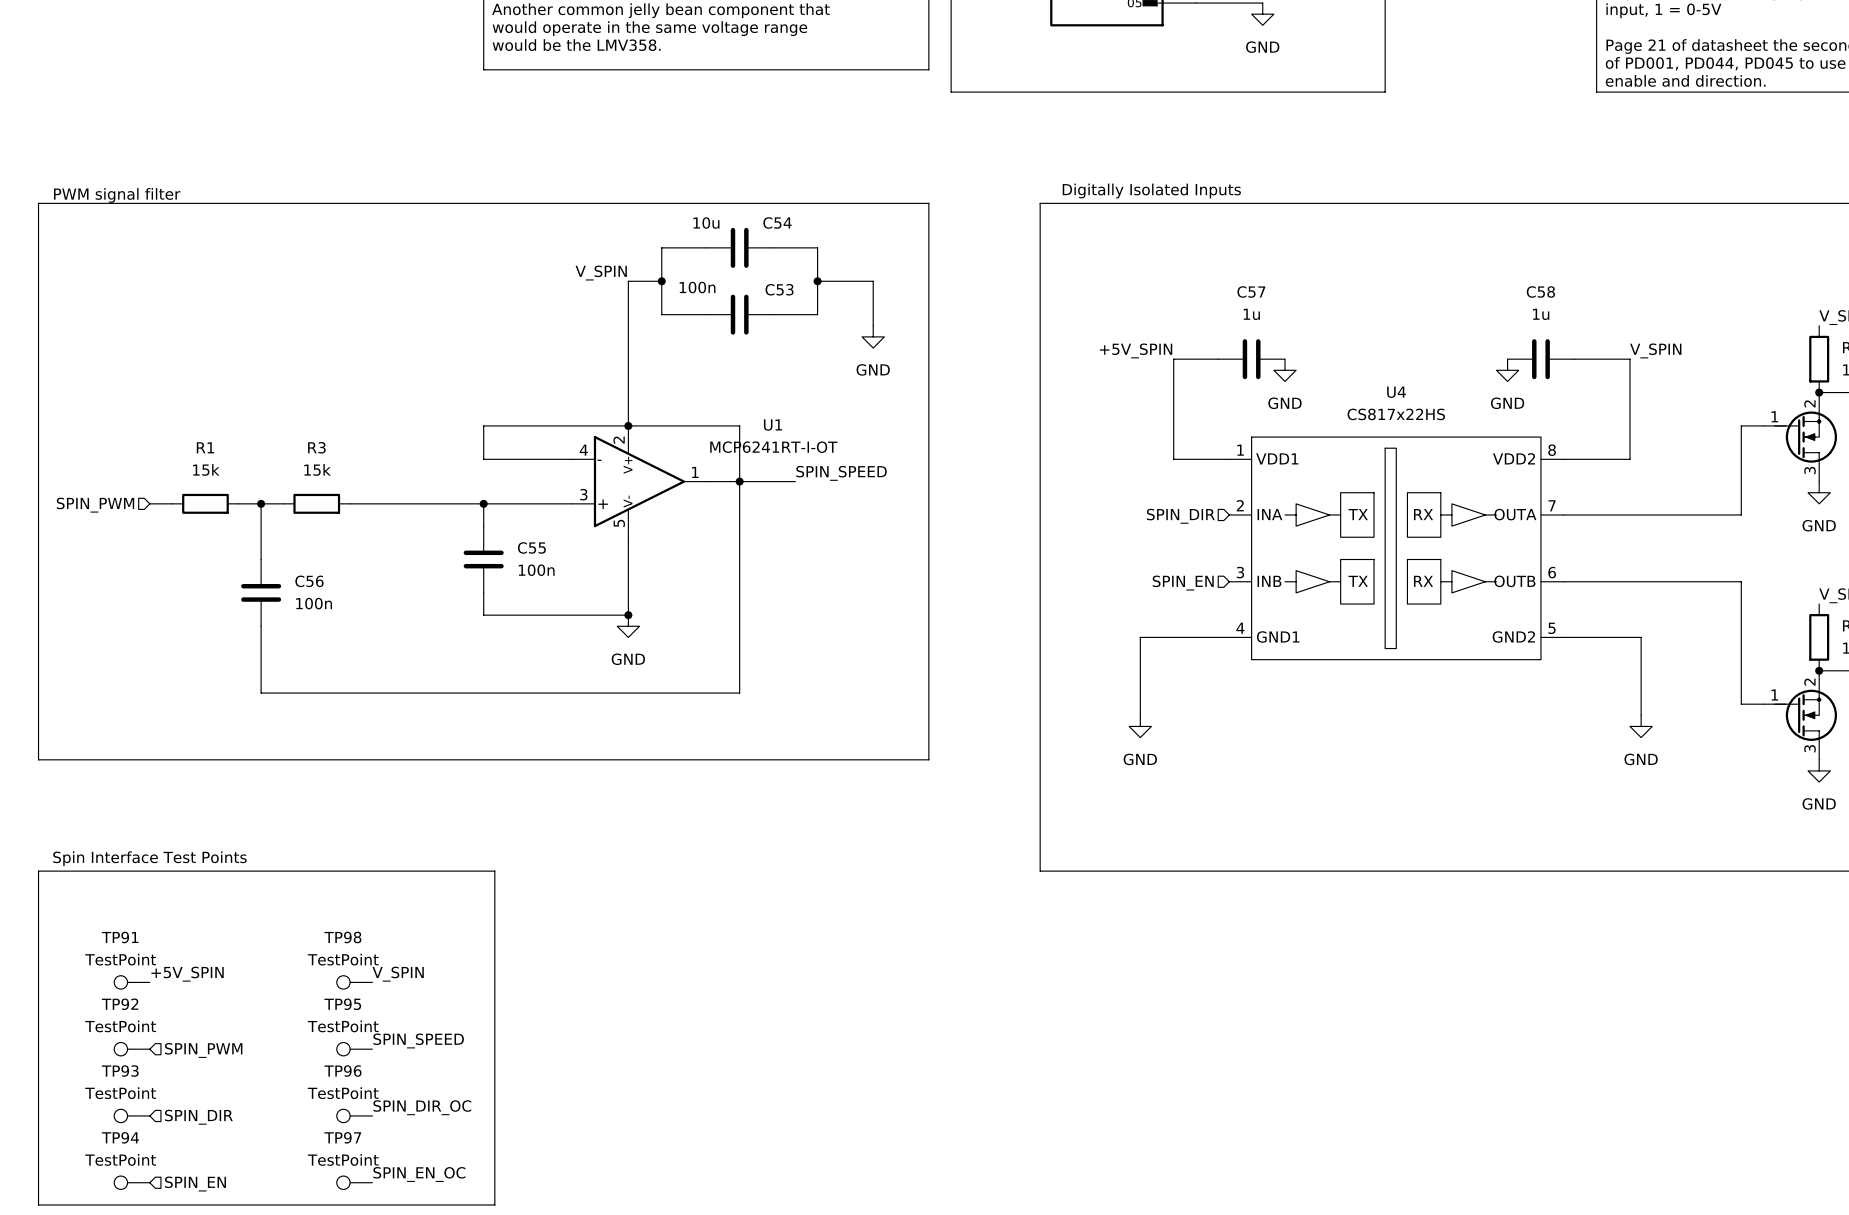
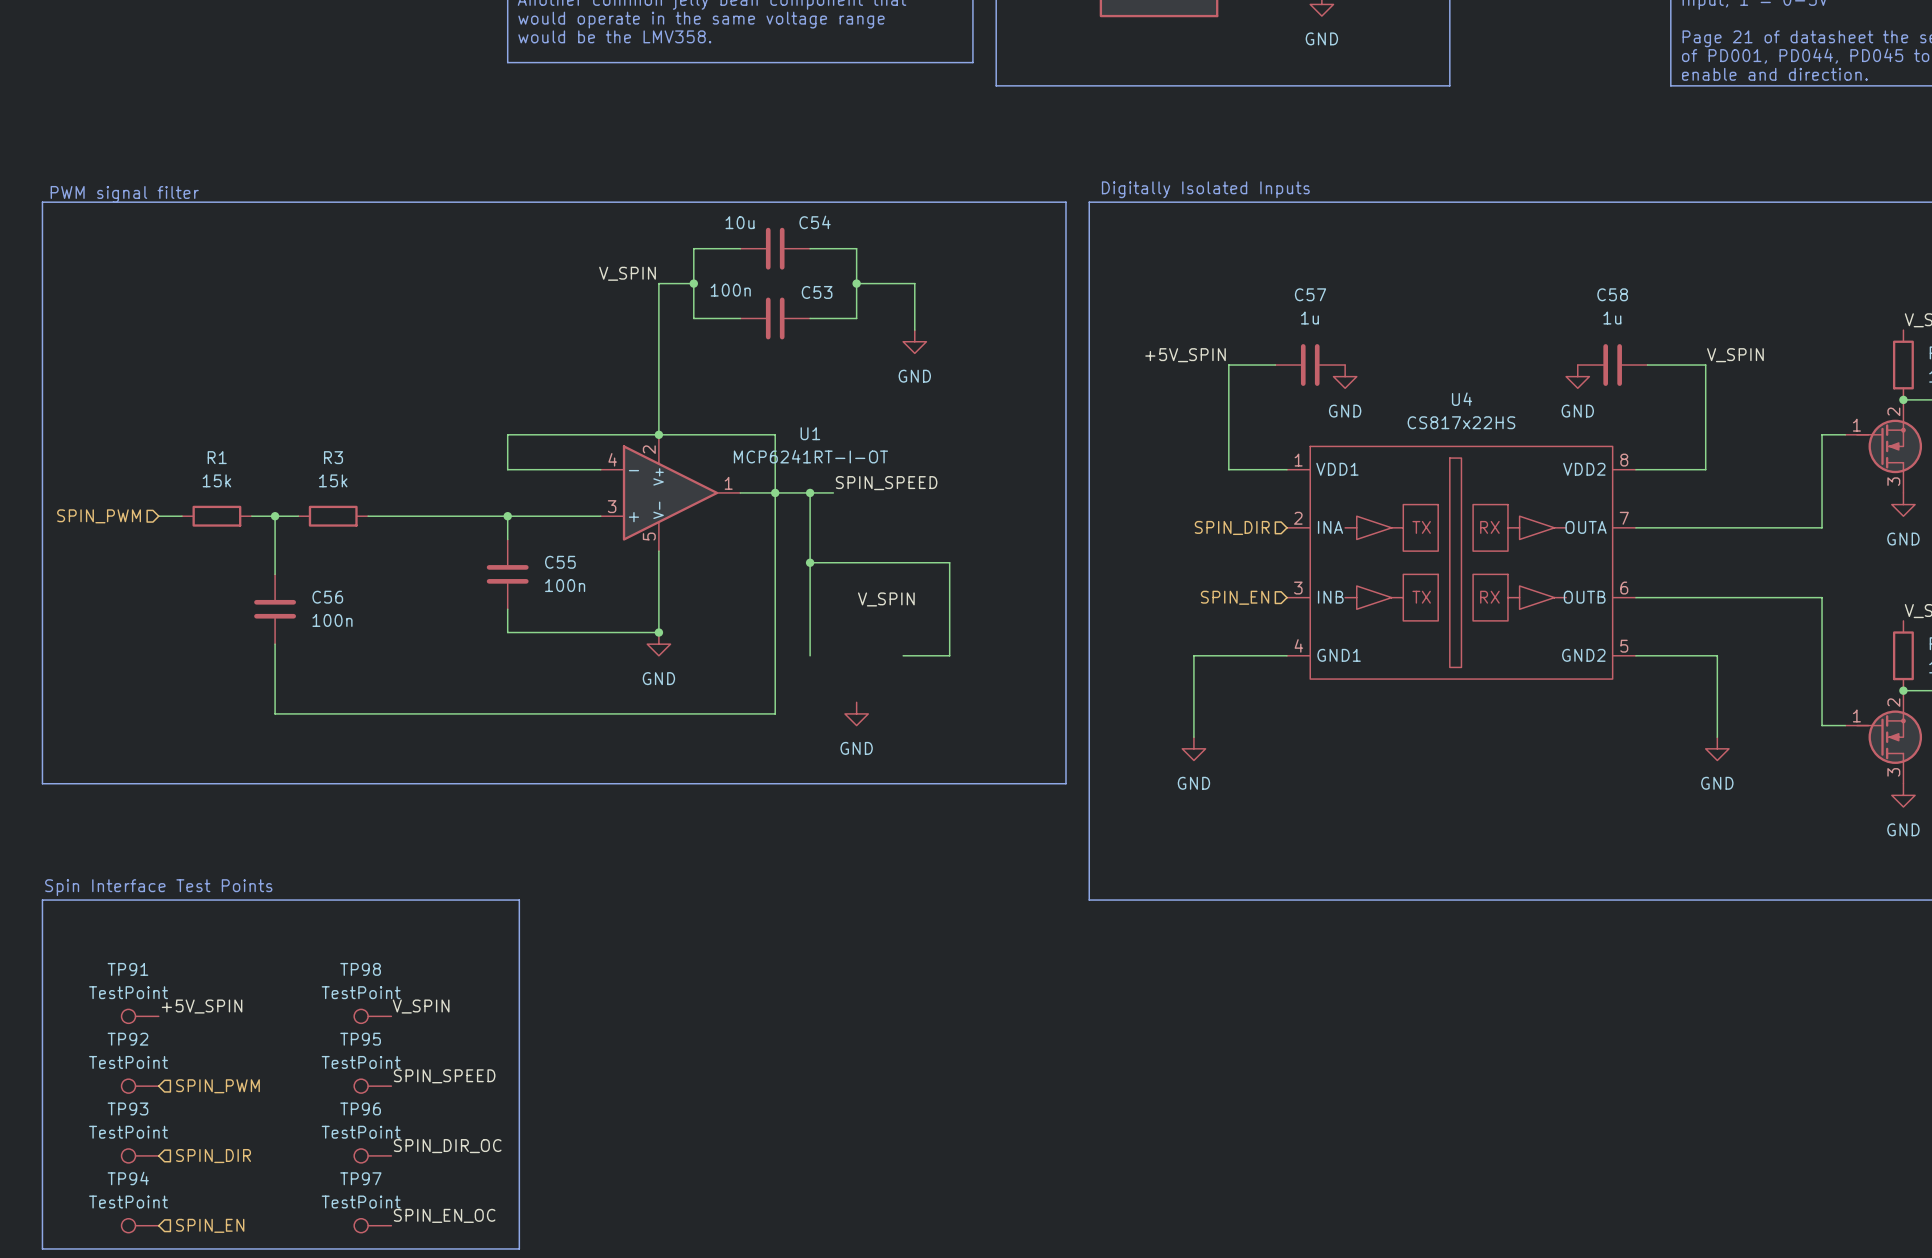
line: (928, 203) (928, 759) -> (972, 202) (1065, 202) (1065, 783) (972, 783)
wire: none -> (810, 492) (810, 655)
junction: none -> (810, 492)
wire: none -> (810, 562) (949, 562) (949, 655) (903, 655)
junction: none -> (810, 562)
label: none -> V_SPIN (886, 599)
power symbol: none -> GND (856, 713)

